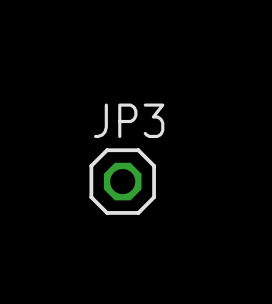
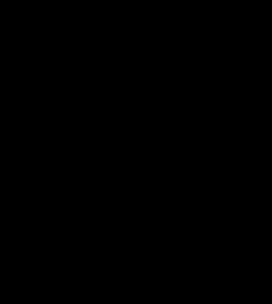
JP3: (122, 181) -> none

